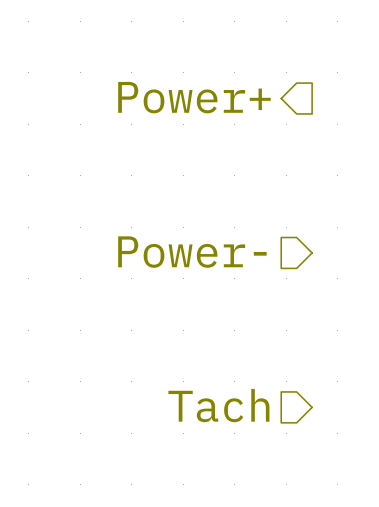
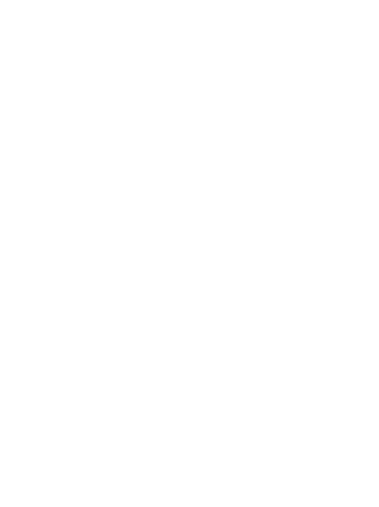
hierarchical label: Power+ (194, 97) -> none
hierarchical label: Power- (192, 252) -> none
hierarchical label: Tach (218, 405) -> none

